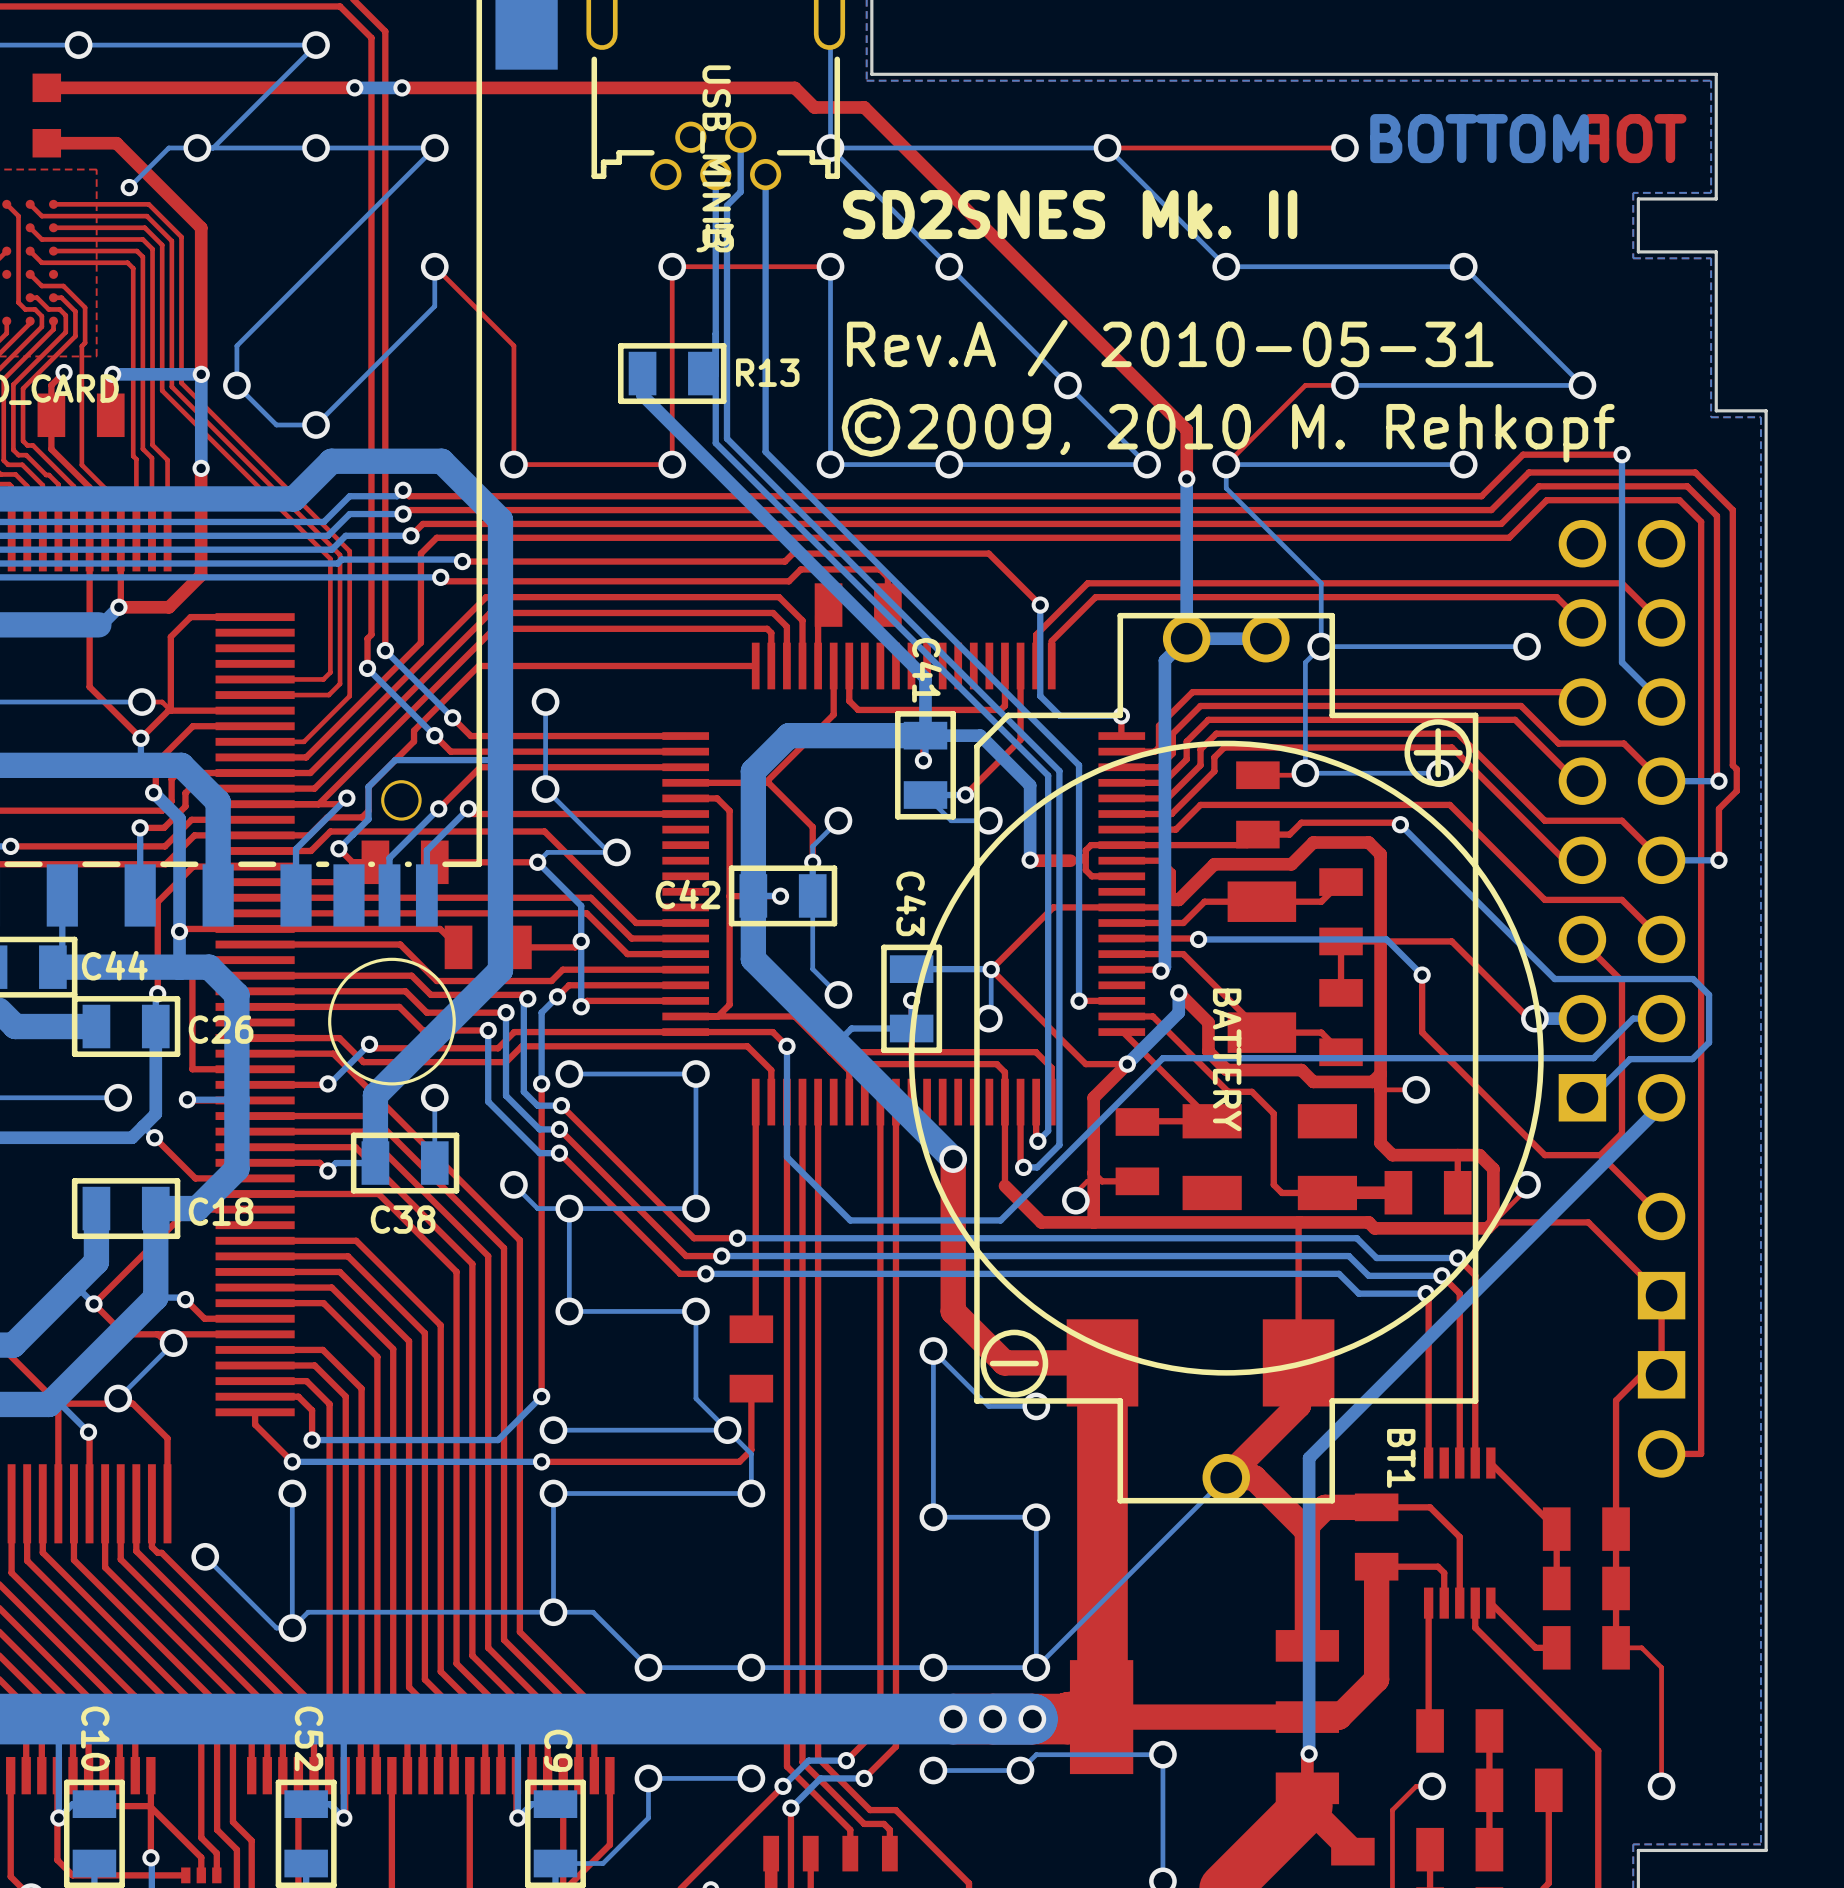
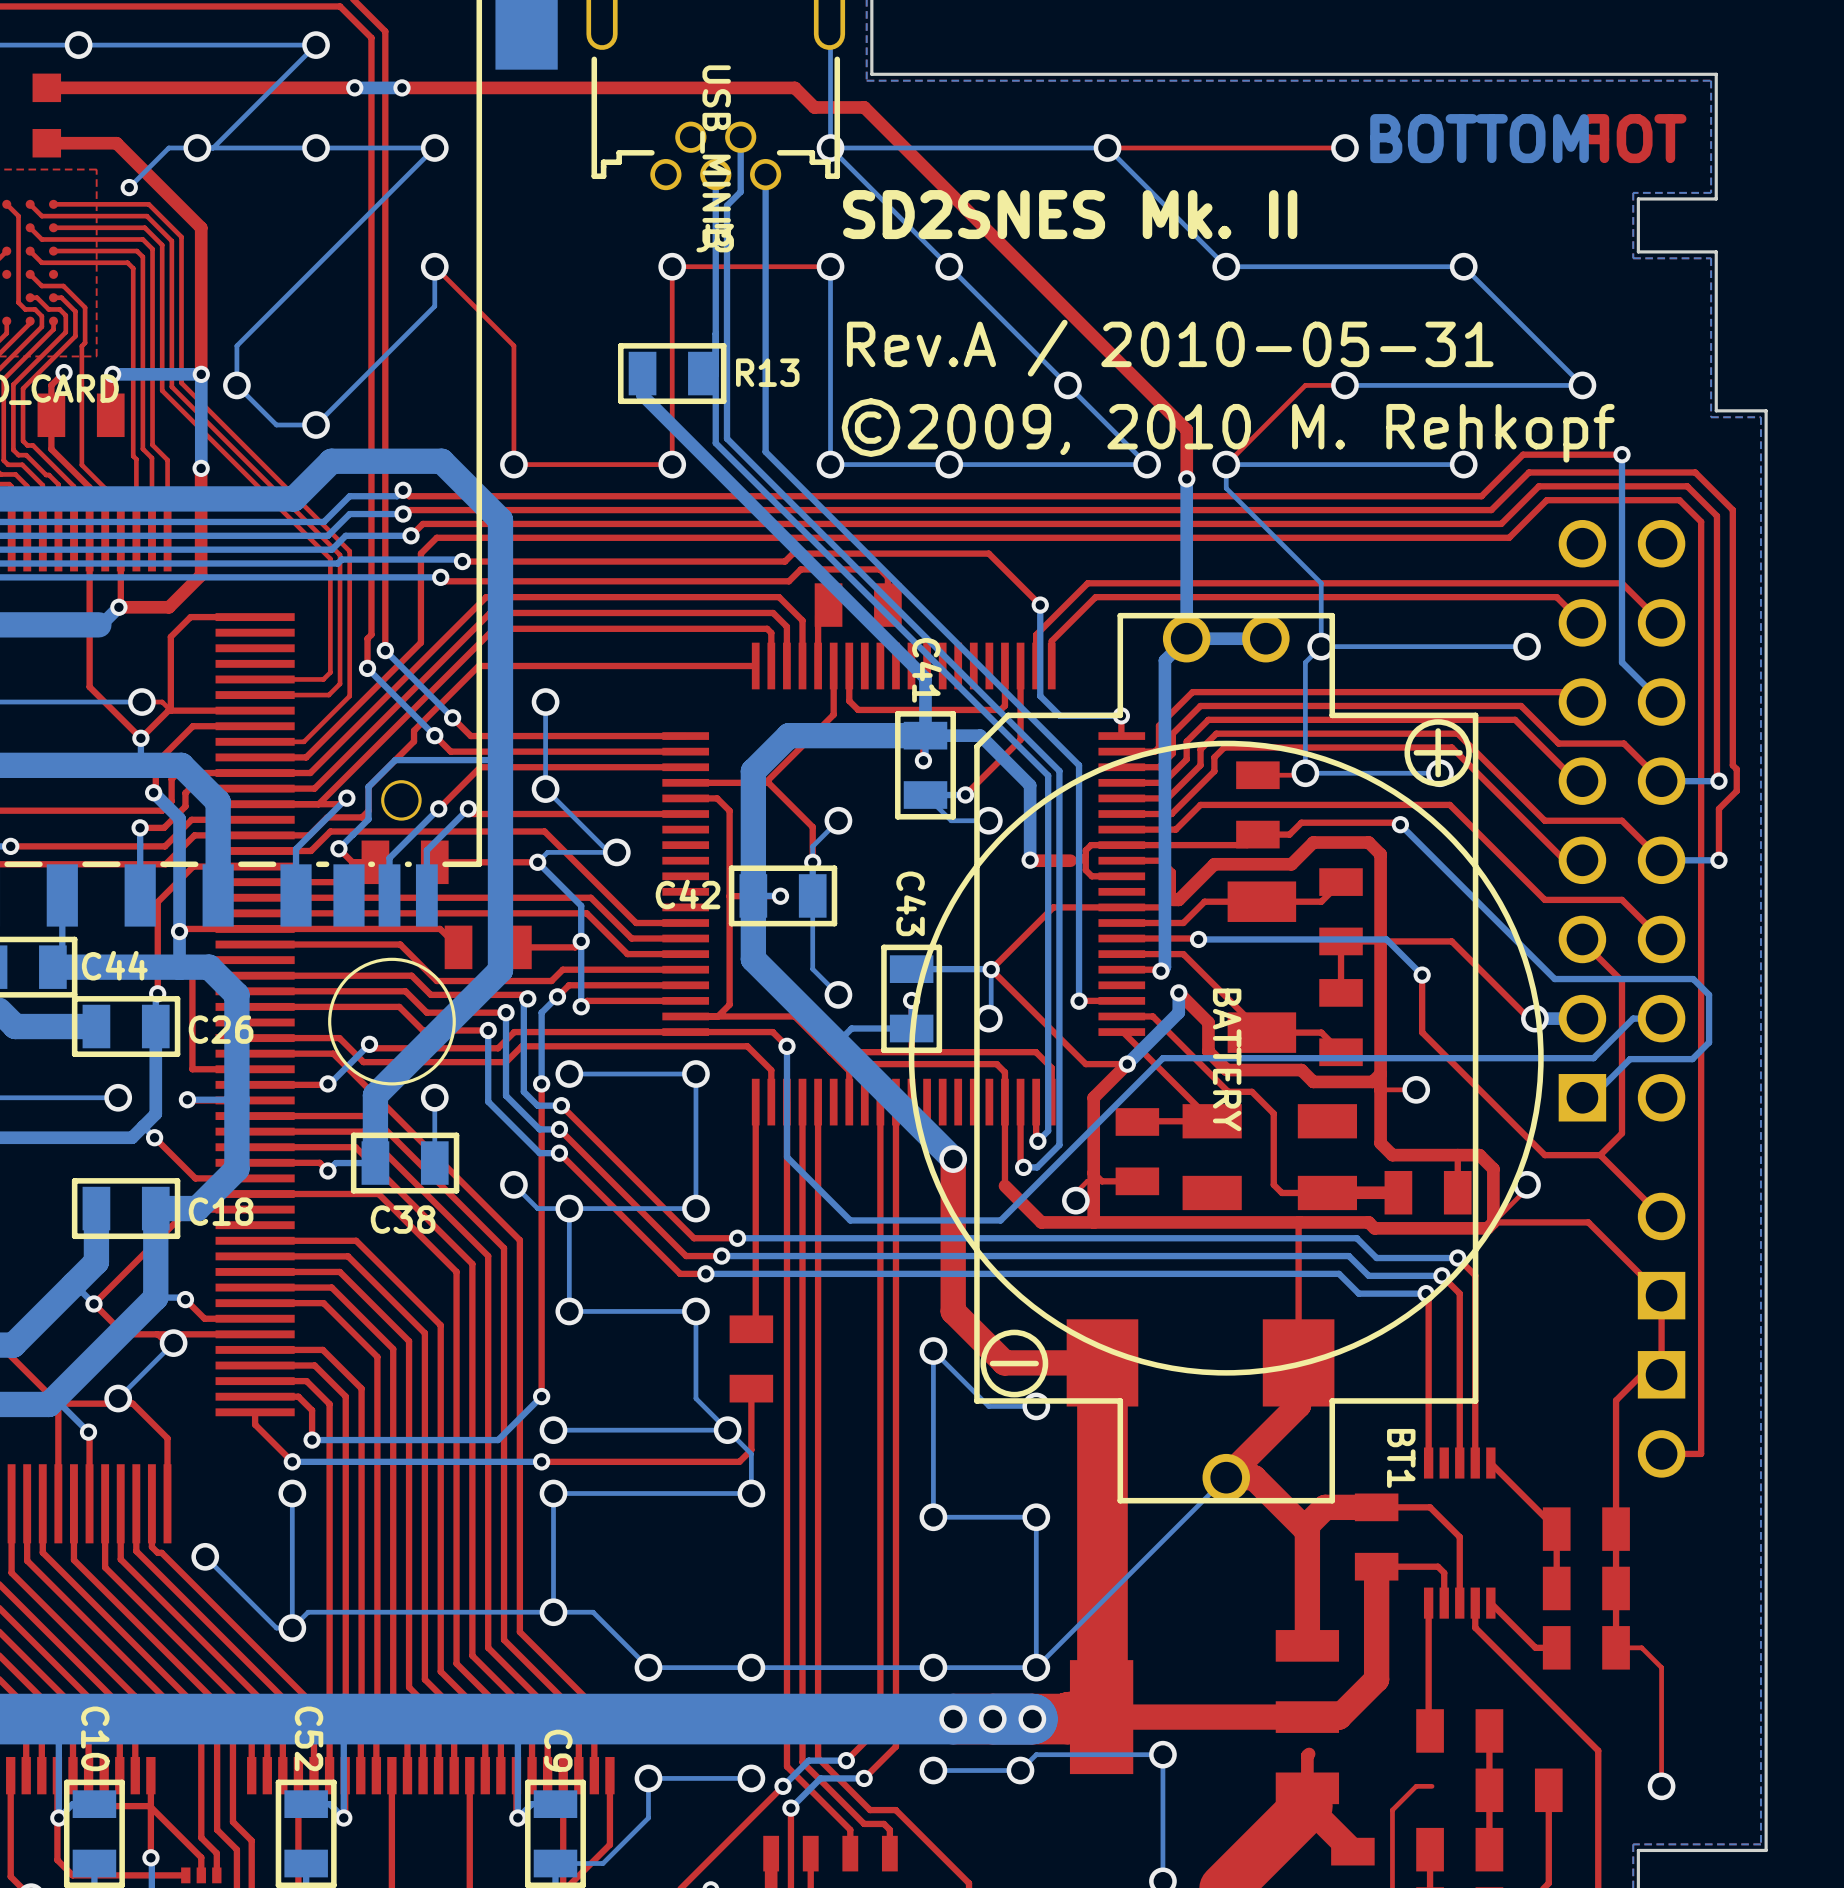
bottom track: (1661, 1097) (1661, 1105) (1309, 1458) (1309, 1753) -> none
via: (1309, 1753) -> none
via: (1432, 1786) -> none

